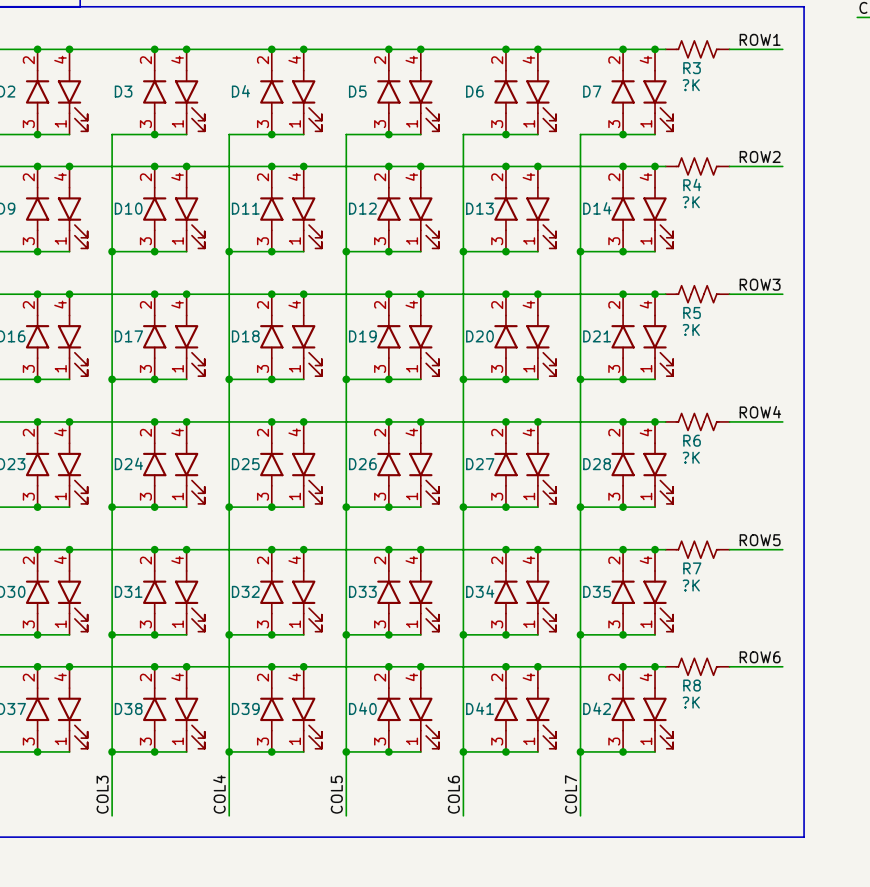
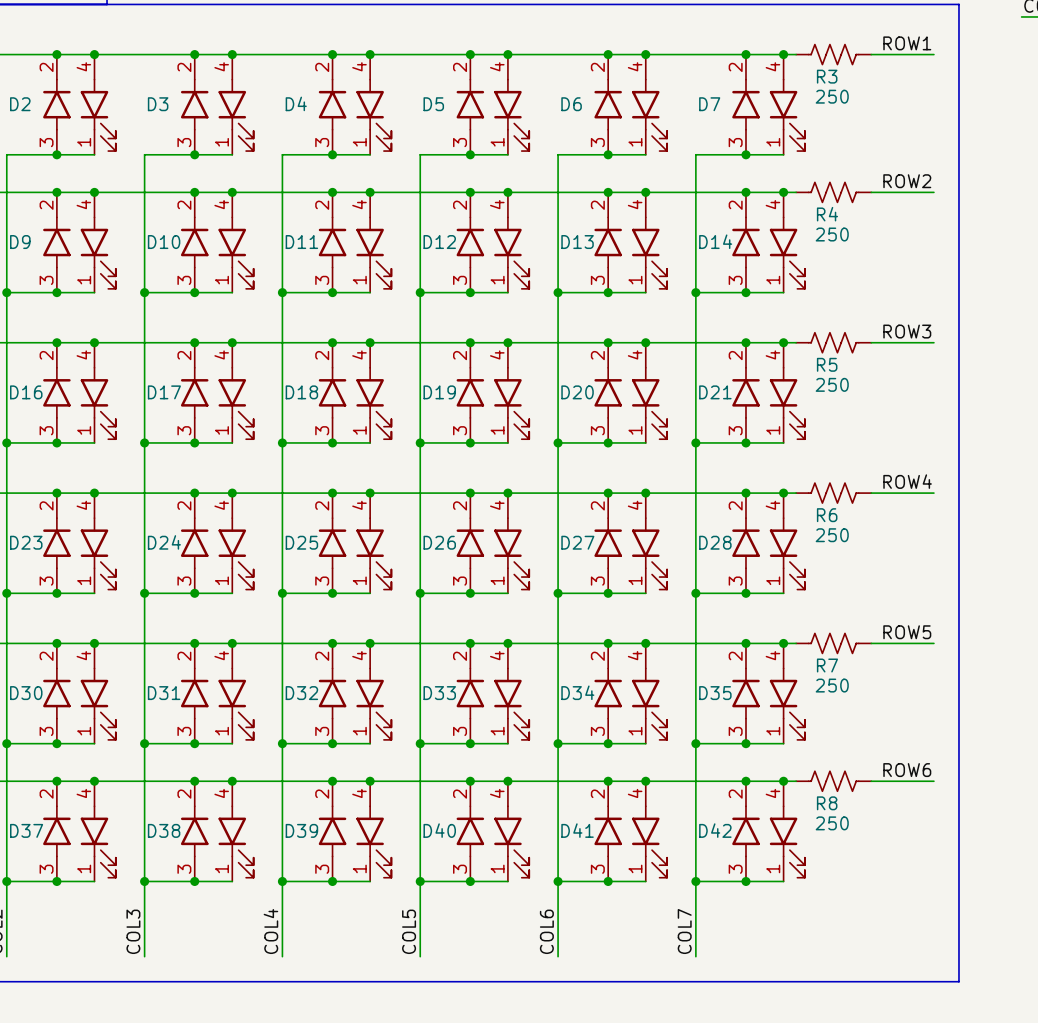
R3 value: ?K (691, 85) -> 250 (832, 96)
R4 value: ?K (691, 202) -> 250 (832, 234)
R5 value: ?K (691, 330) -> 250 (832, 384)
R6 value: ?K (691, 457) -> 250 (832, 535)
R7 value: ?K (691, 585) -> 250 (832, 685)
R8 value: ?K (691, 702) -> 250 (832, 823)

